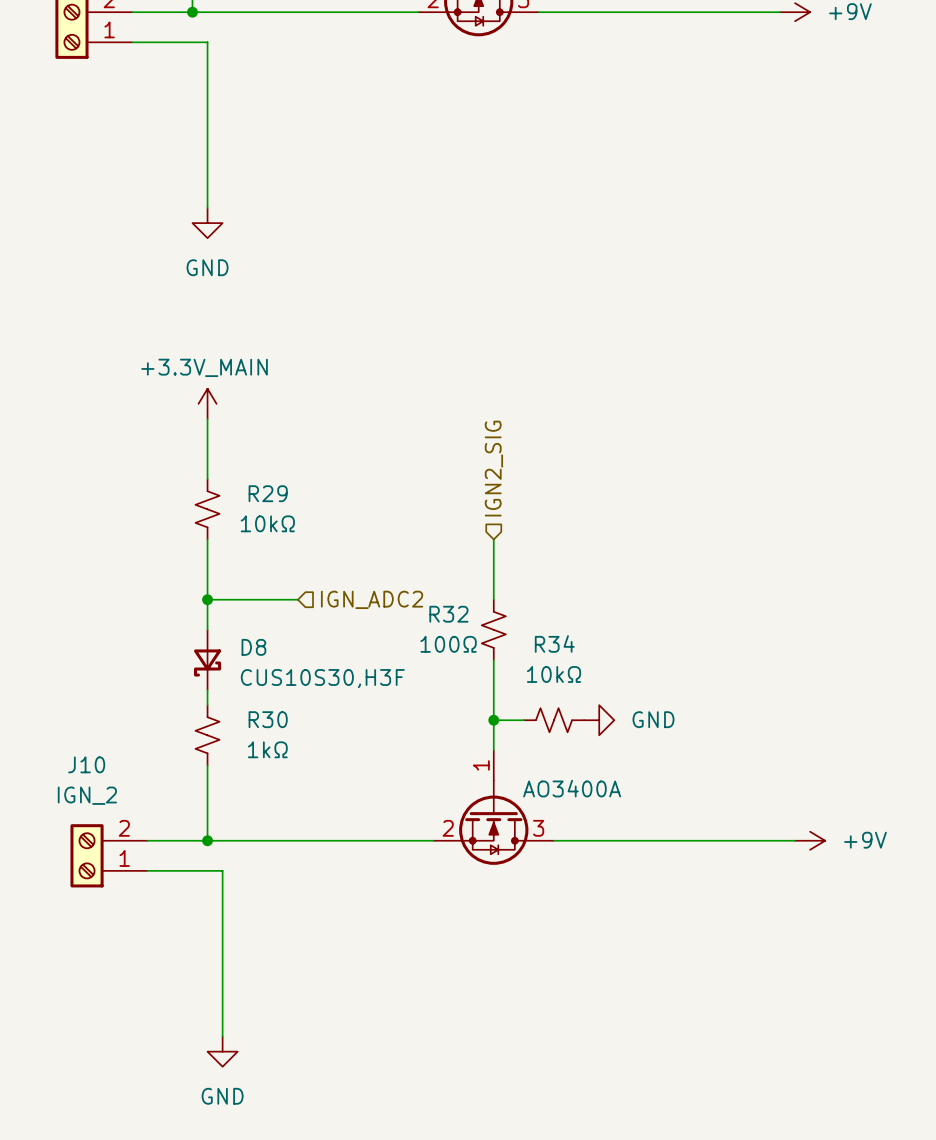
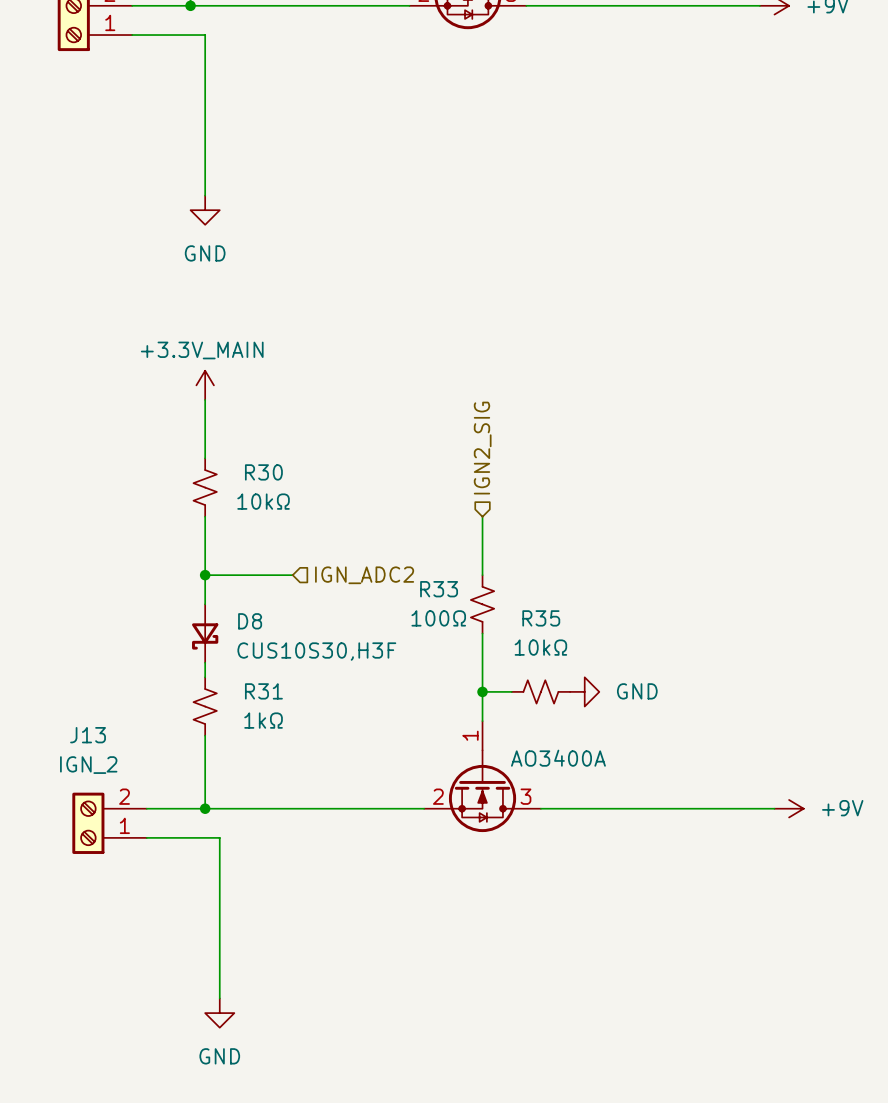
R29 name: R29 (268, 493) -> R30 (263, 472)
R32 name: R32 (448, 614) -> R33 (439, 589)
R34 name: R34 (554, 643) -> R35 (541, 618)
R30 name: R30 (268, 719) -> R31 (263, 691)
J10 name: J10 (86, 764) -> J13 (88, 735)

